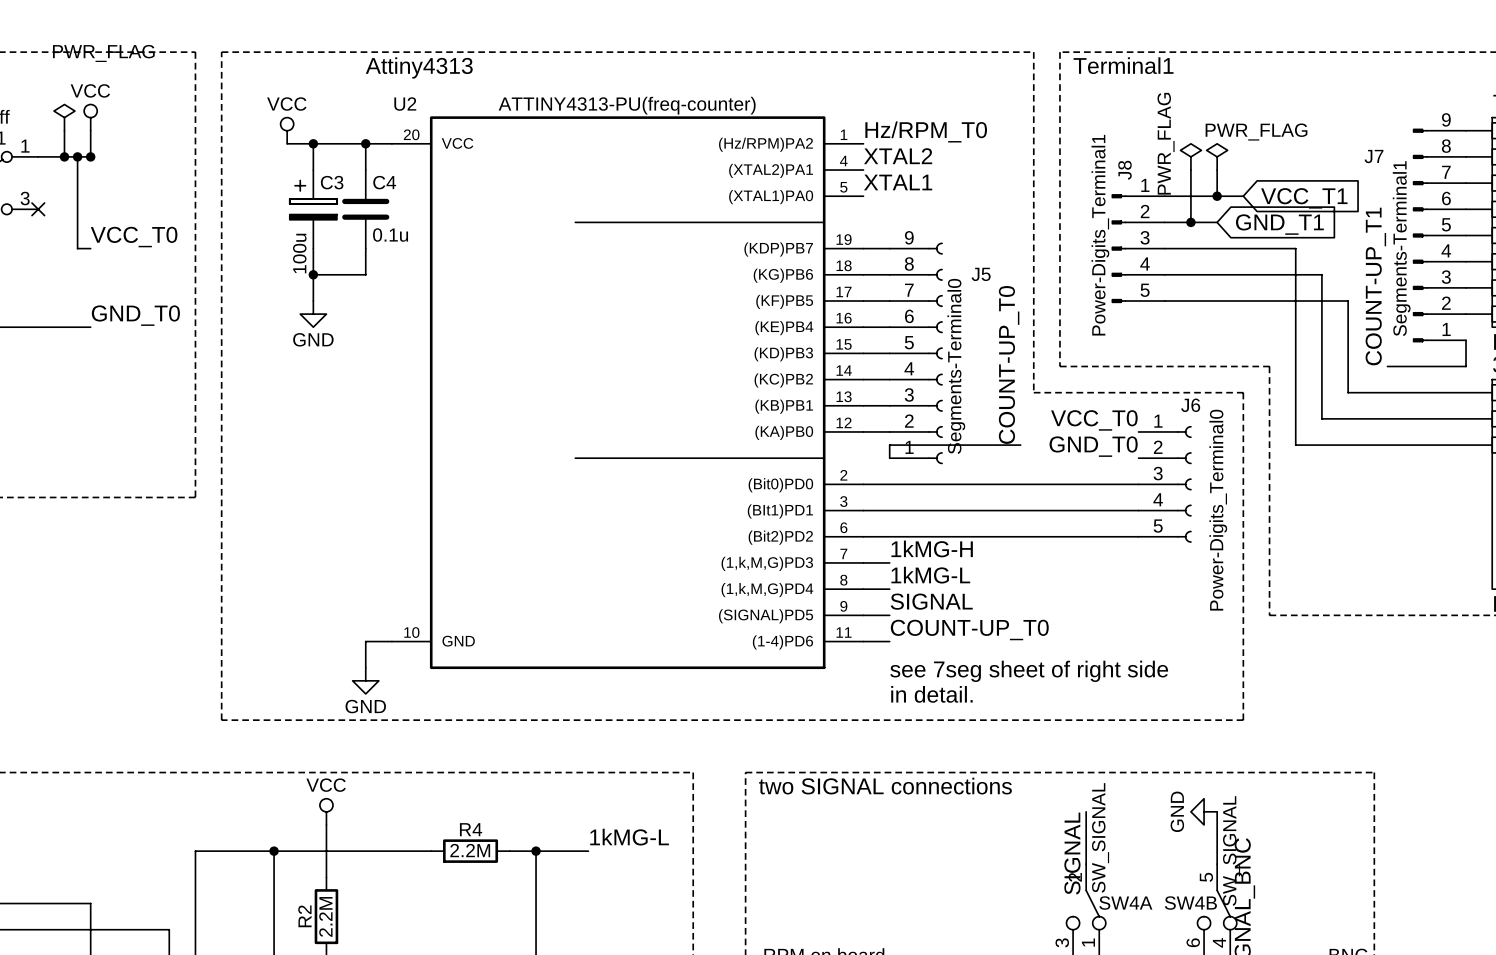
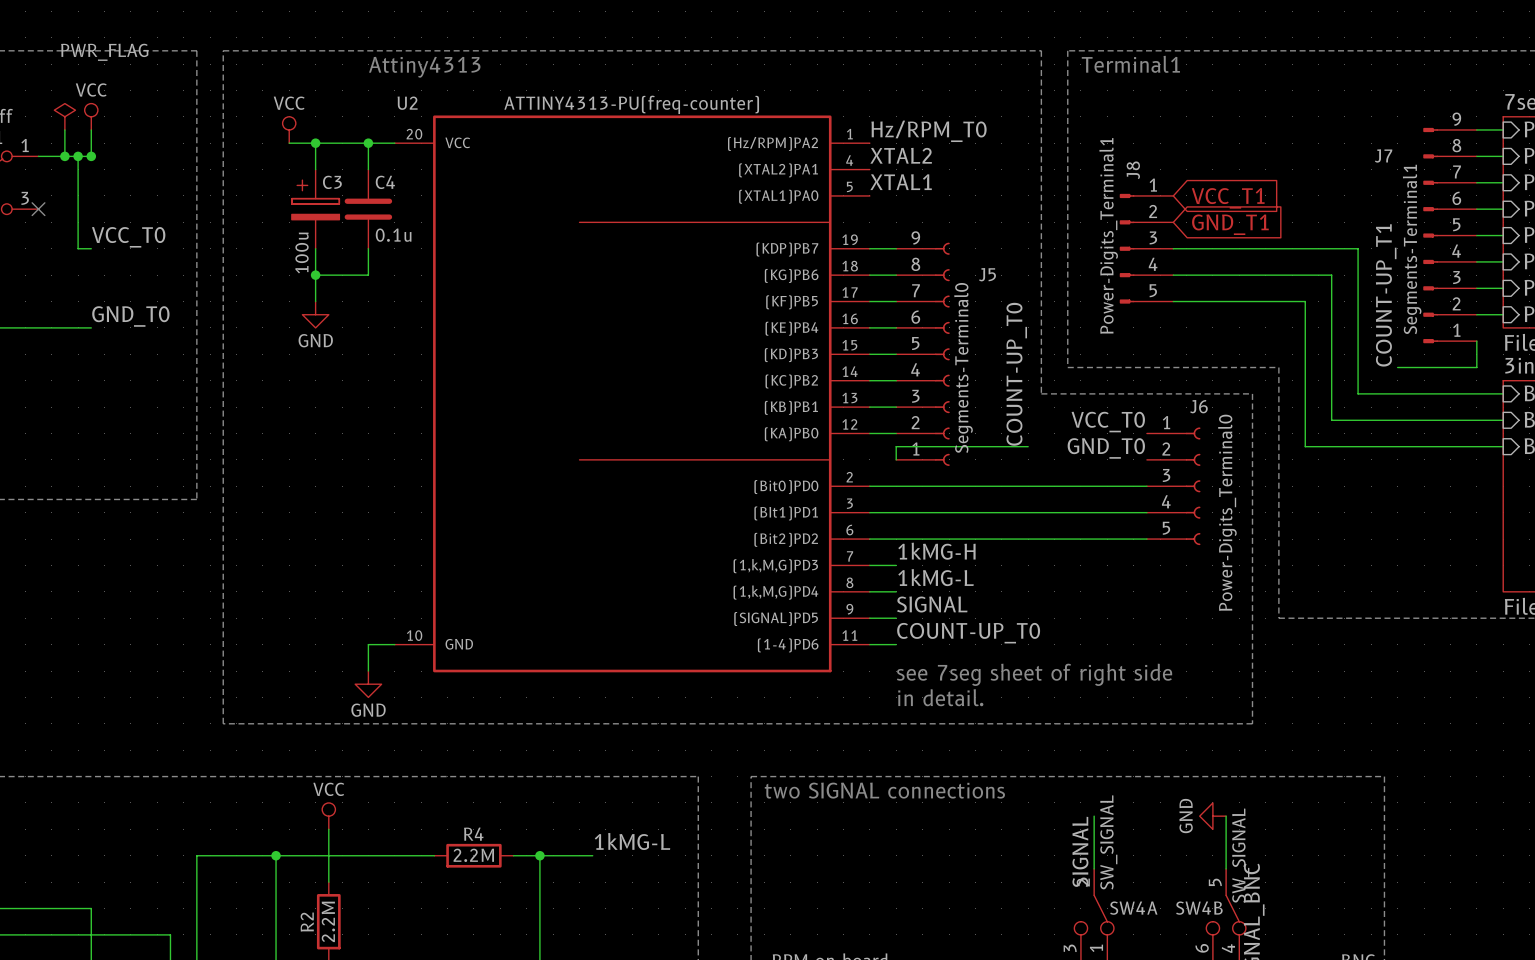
power symbol: PWR_FLAG (1190, 156) -> none
power symbol: PWR_FLAG (1217, 156) -> none
wire: (1190, 170) (1190, 222) -> none
wire: (1217, 170) (1217, 196) -> none
wire: (1164, 196) (1243, 196) -> none
junction: (1217, 196) -> none
global label position: VCC_T1 (1304, 198) -> VCC_T1 (1228, 198)
wire: (1164, 222) (1217, 222) -> none
junction: (1190, 222) -> none
global label position: GND_T1 (1279, 224) -> GND_T1 (1230, 224)
wire: (1295, 248) (1295, 301) (1348, 301) -> (1305, 248) (1358, 248) (1358, 301)

